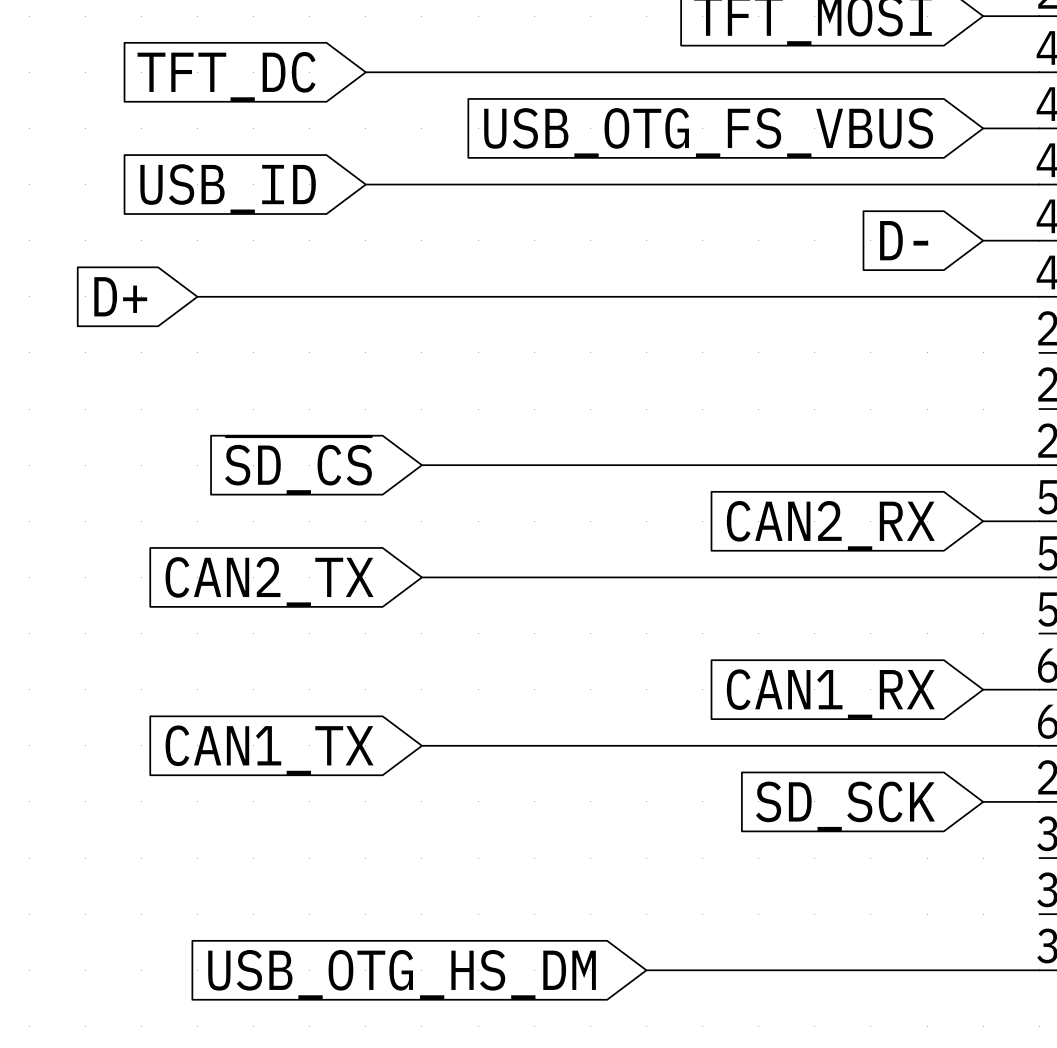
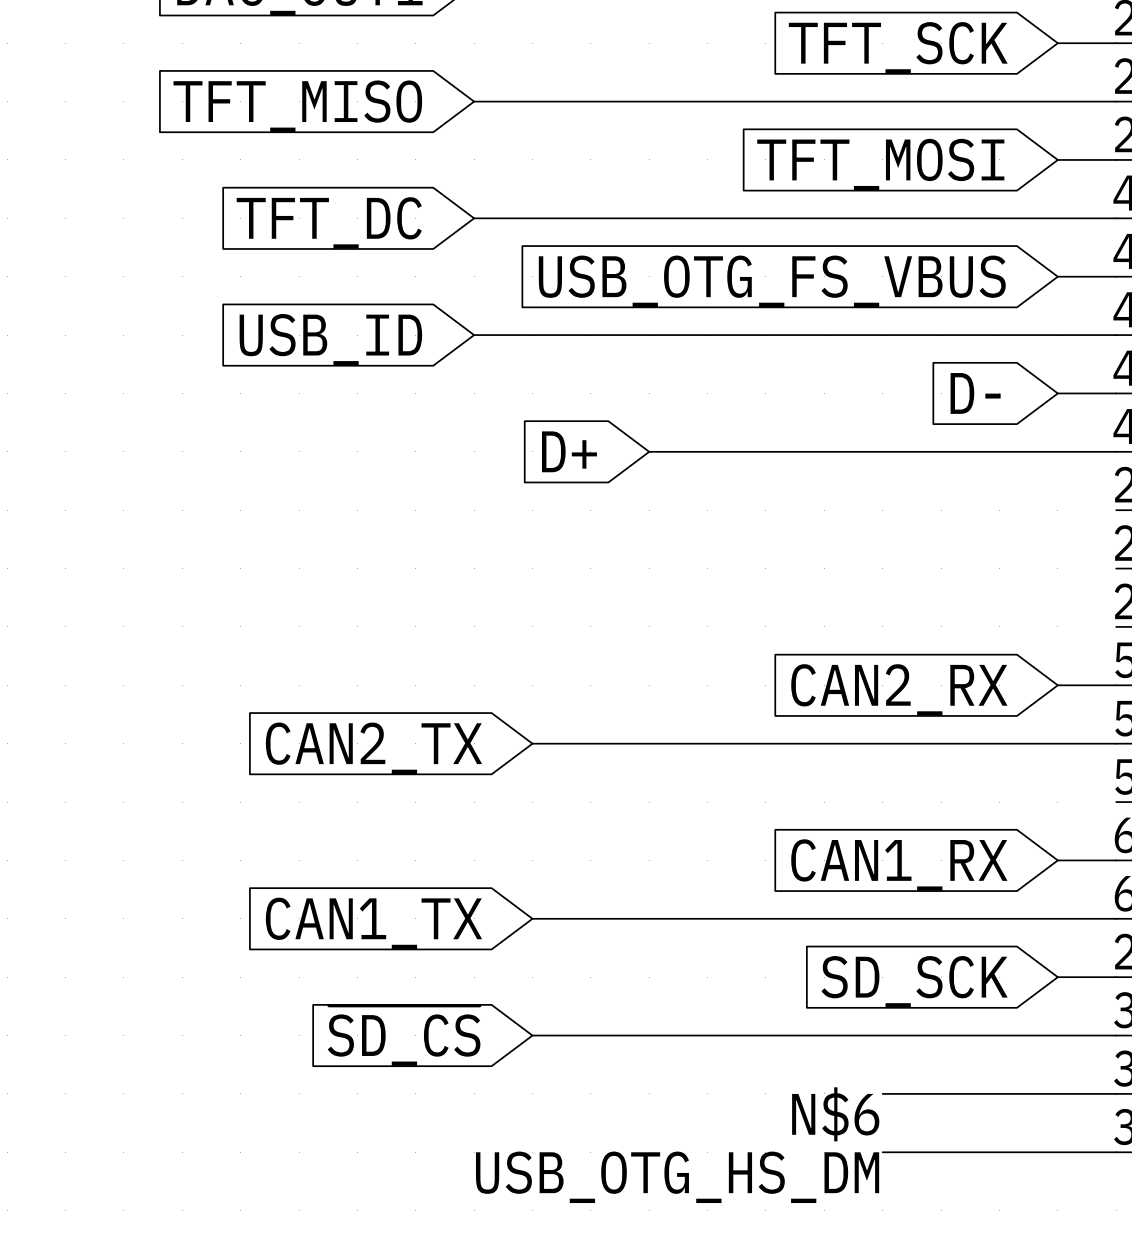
wire: (365, 72) (421, 72) -> none
global label position: TFT_DC (226, 76) -> TFT_DC (329, 222)
wire: (365, 184) (421, 184) -> none
global label position: USB_ID (228, 188) -> USB_ID (330, 339)
global label position: D+ (120, 296) -> D+ (569, 451)
wire: (197, 296) (590, 296) -> none
global label position: ~{SD_CS} (298, 465) -> ~{SD_CS} (404, 1035)
wire: (421, 465) (1039, 465) -> none
wire: (421, 577) (478, 577) -> none
global label position: CAN2_TX (269, 581) -> CAN2_TX (374, 748)
wire: (421, 745) (478, 745) -> none
global label position: CAN1_TX (269, 750) -> CAN1_TX (374, 923)
wire: none -> (532, 1035) (1116, 1035)
wire: none -> (882, 1093) (1116, 1093)
label: none -> N$6 (835, 1114)
wire: (646, 970) (814, 970) -> none
global label: USB_OTG_HS_DM (402, 974) -> none
label: none -> USB_OTG_HS_DM (677, 1177)

